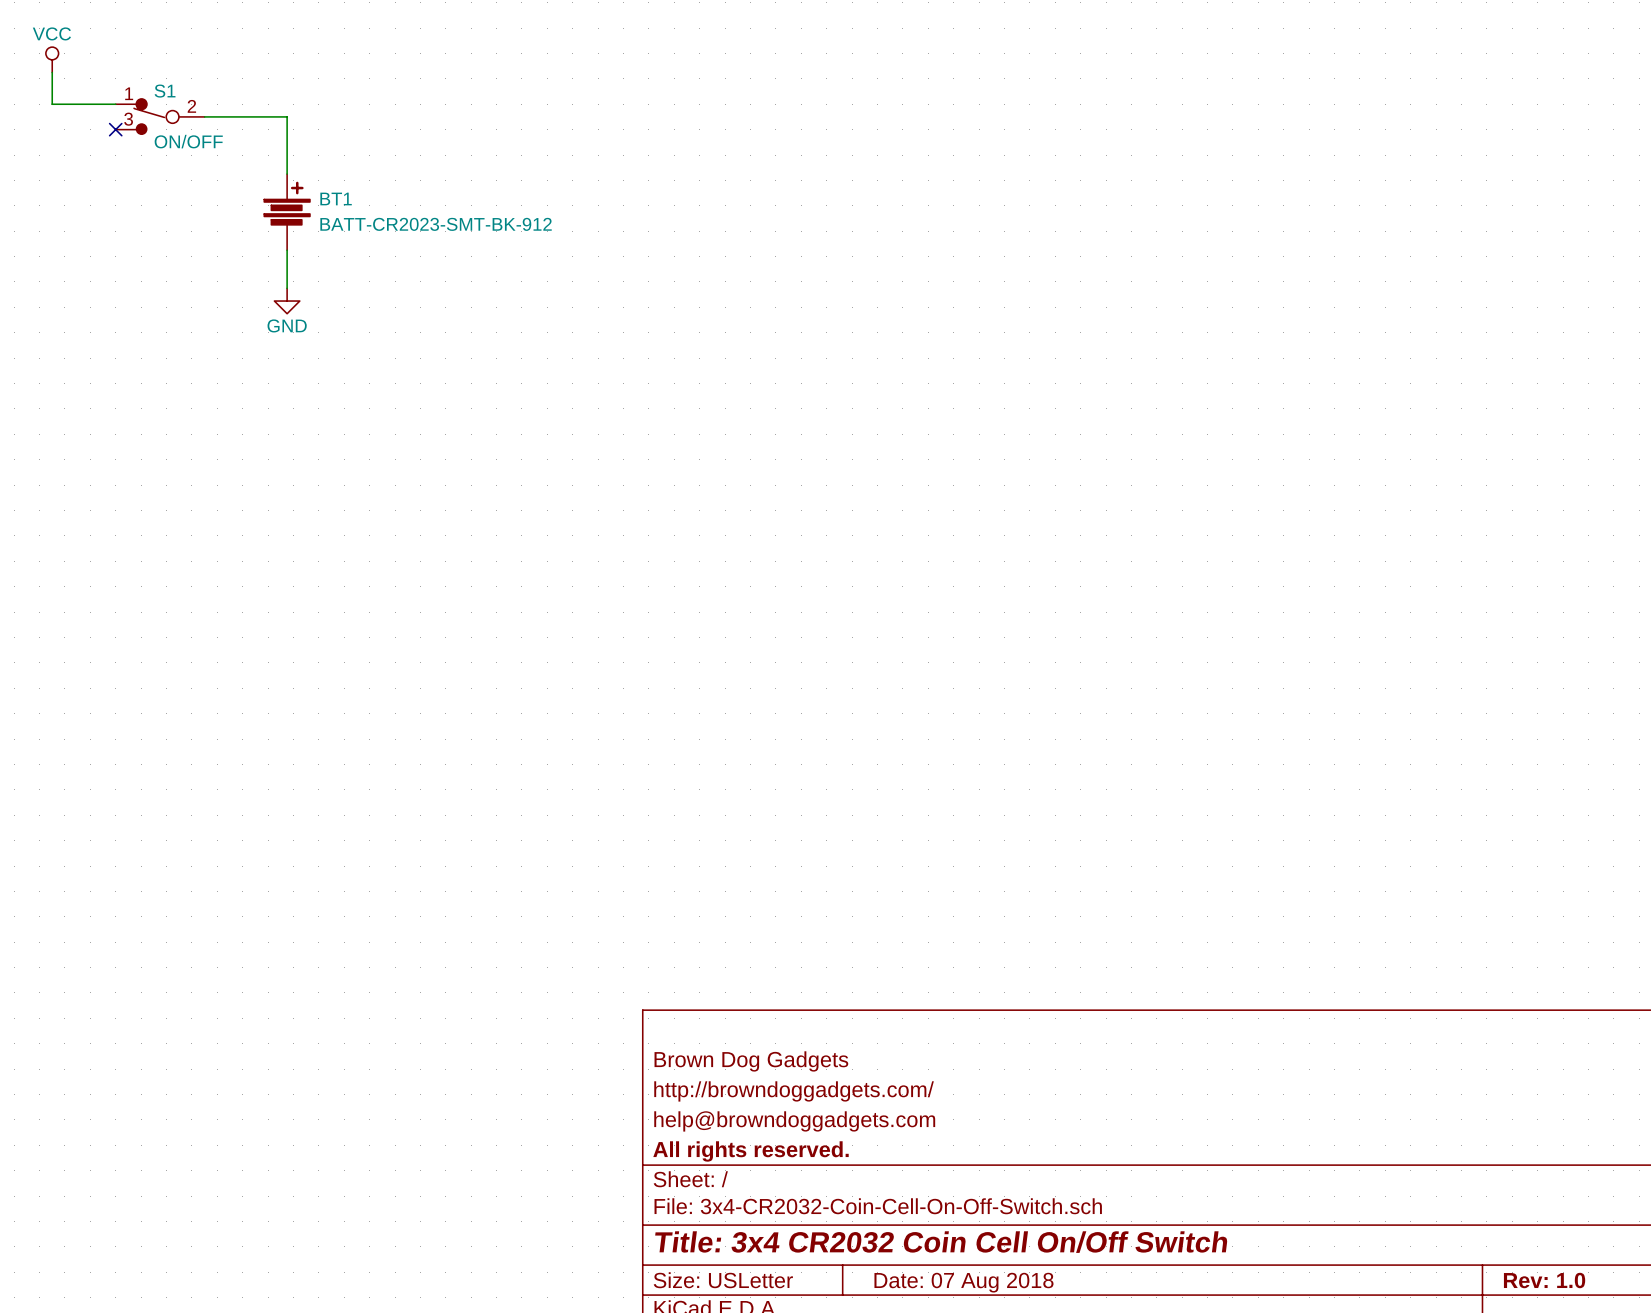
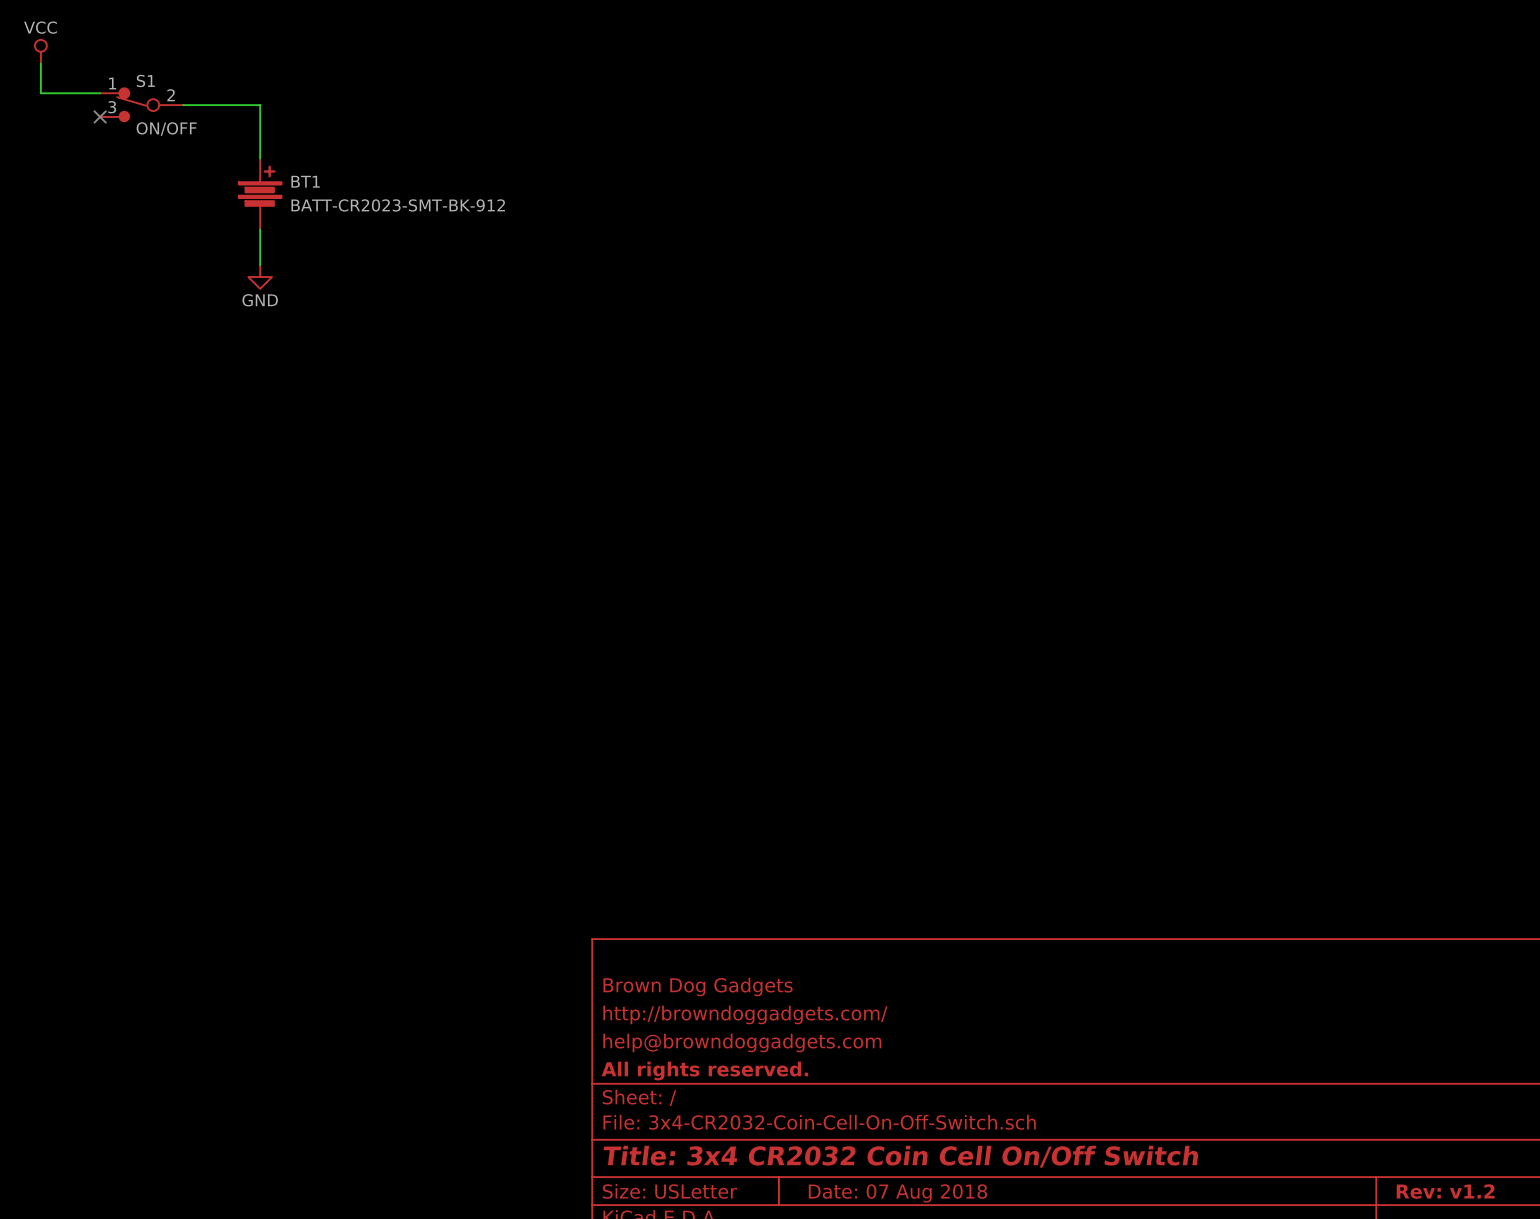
title block: Rev: 1.0 (1544, 1280) -> Rev: v1.2 (1445, 1191)

